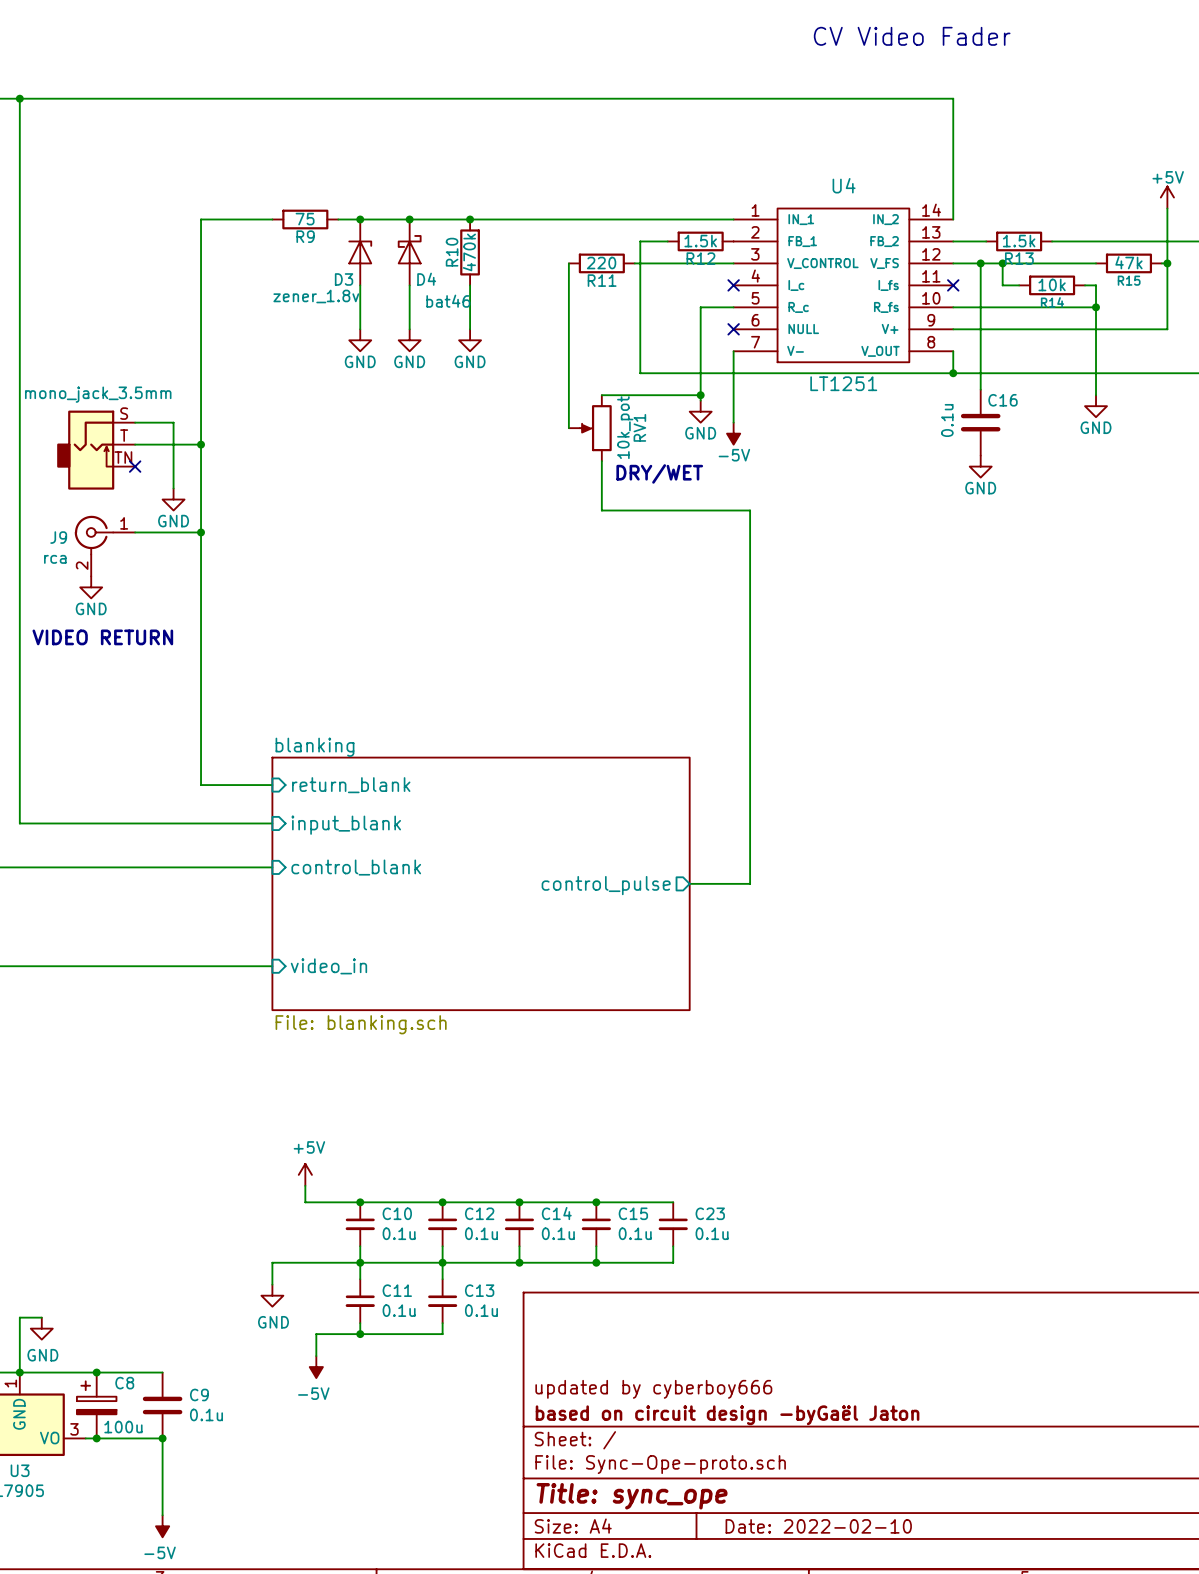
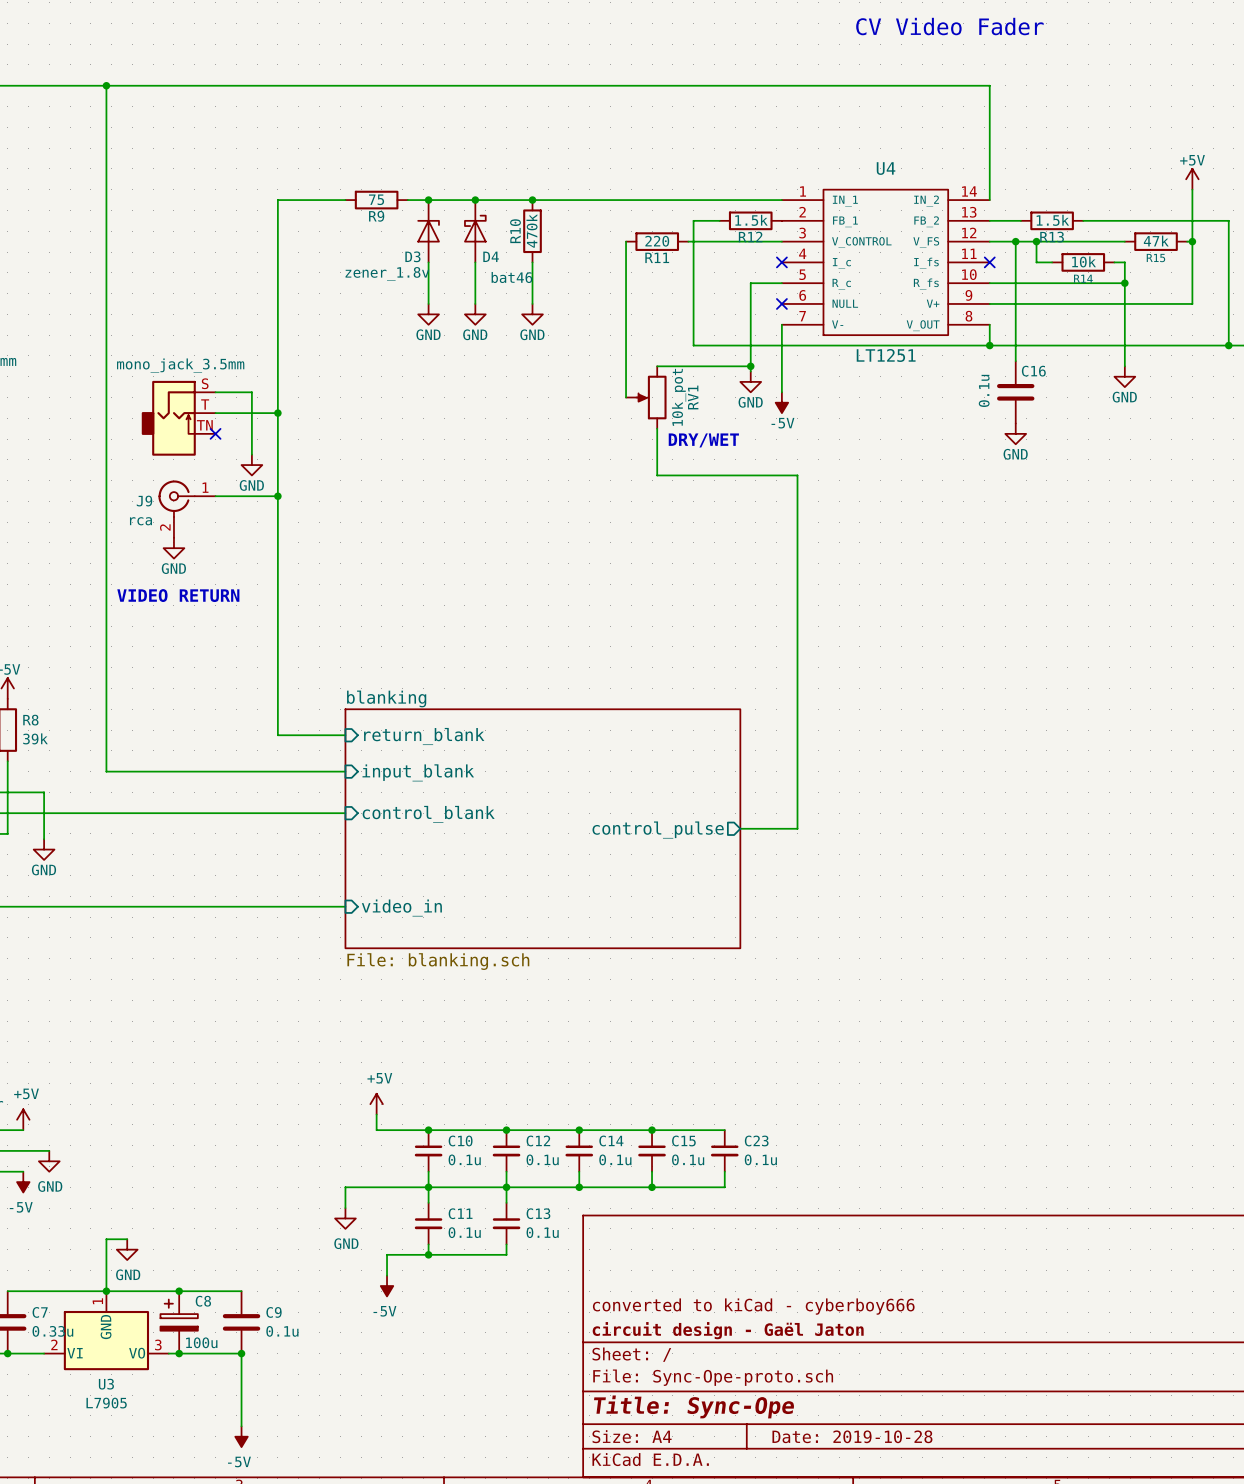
title block: updated by cyberboy666 (653, 1389) -> converted to kiCad - cyberboy666 (753, 1306)
title block: based on circuit design -byGaël Jaton (727, 1415) -> circuit design - Gaël Jaton (728, 1330)
title block: Title: sync_ope (632, 1496) -> Title: Sync-Ope (694, 1406)
title block: Date: 2022-02-10 (818, 1526) -> Date: 2019-10-28 (852, 1436)

